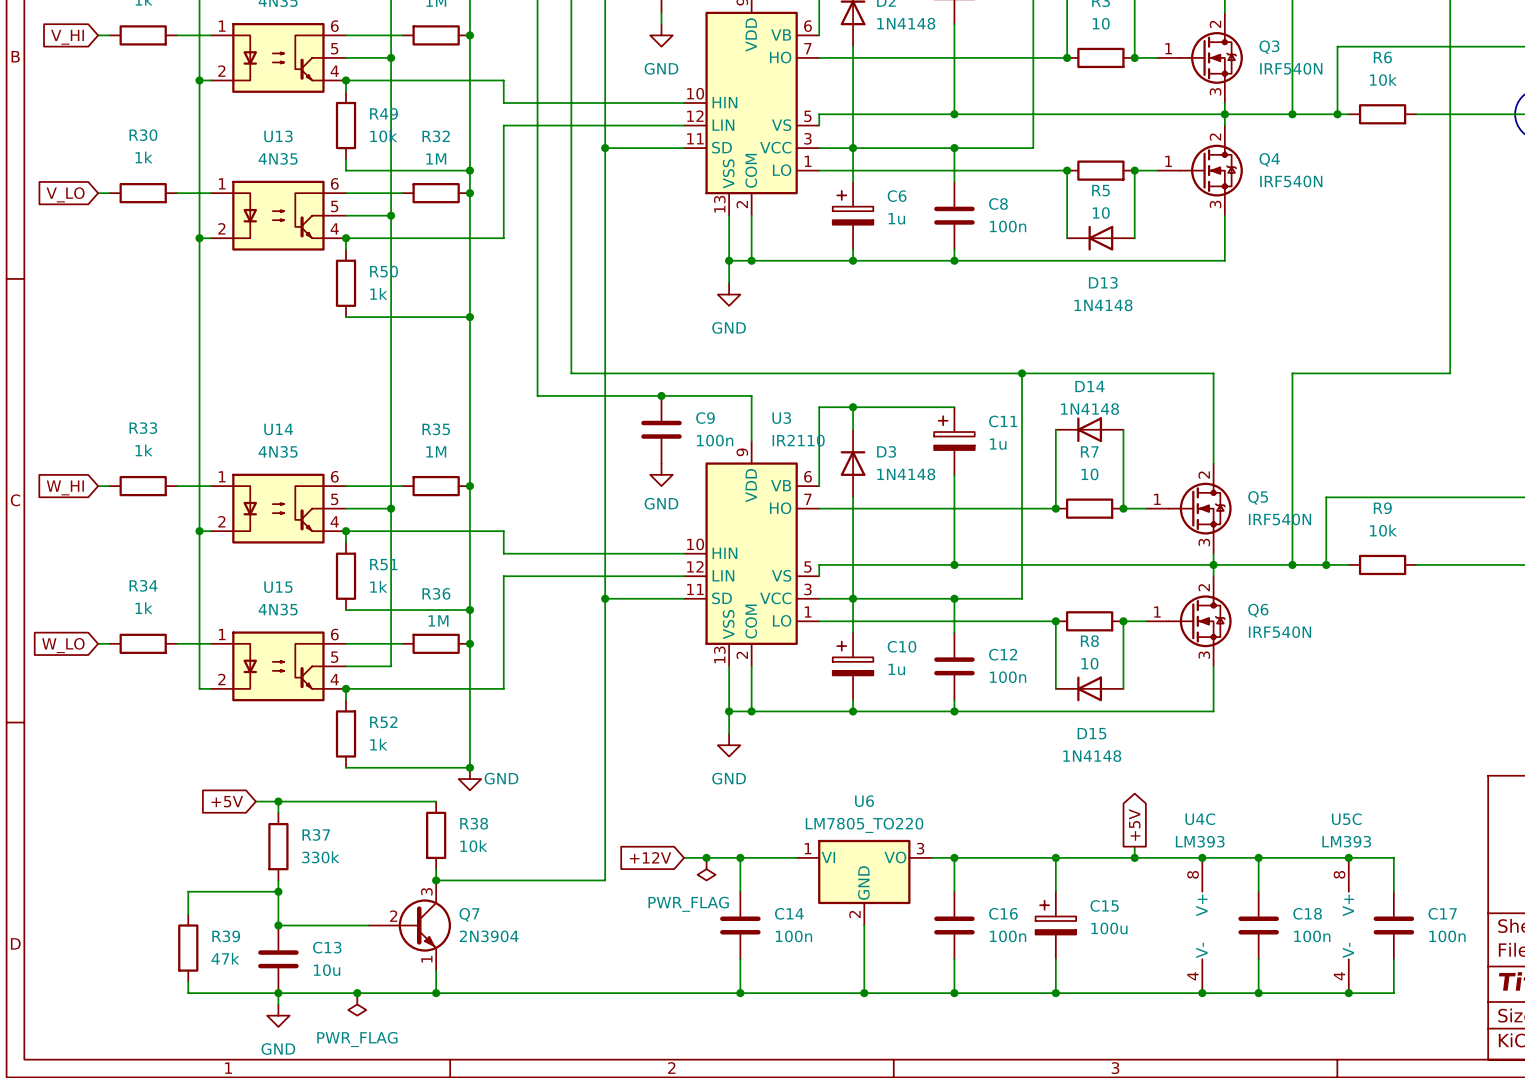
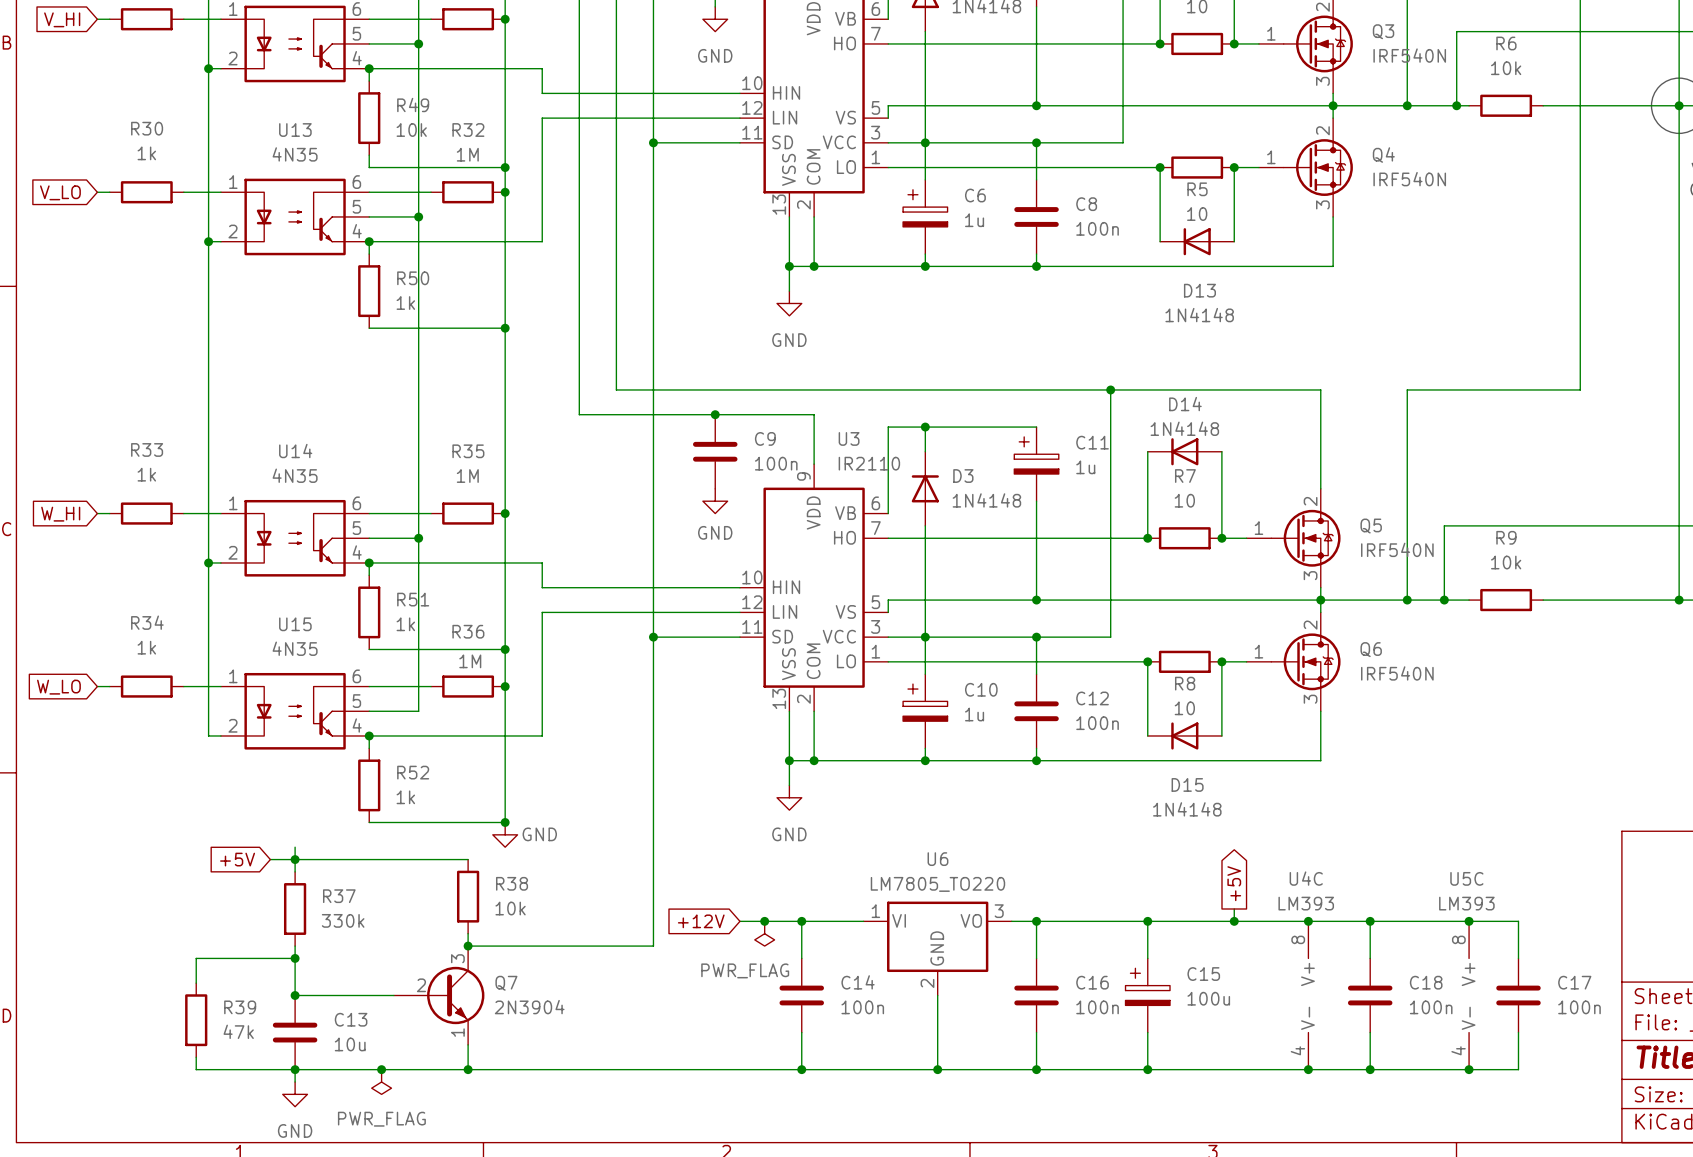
wire: none -> (295, 847) (295, 859)

